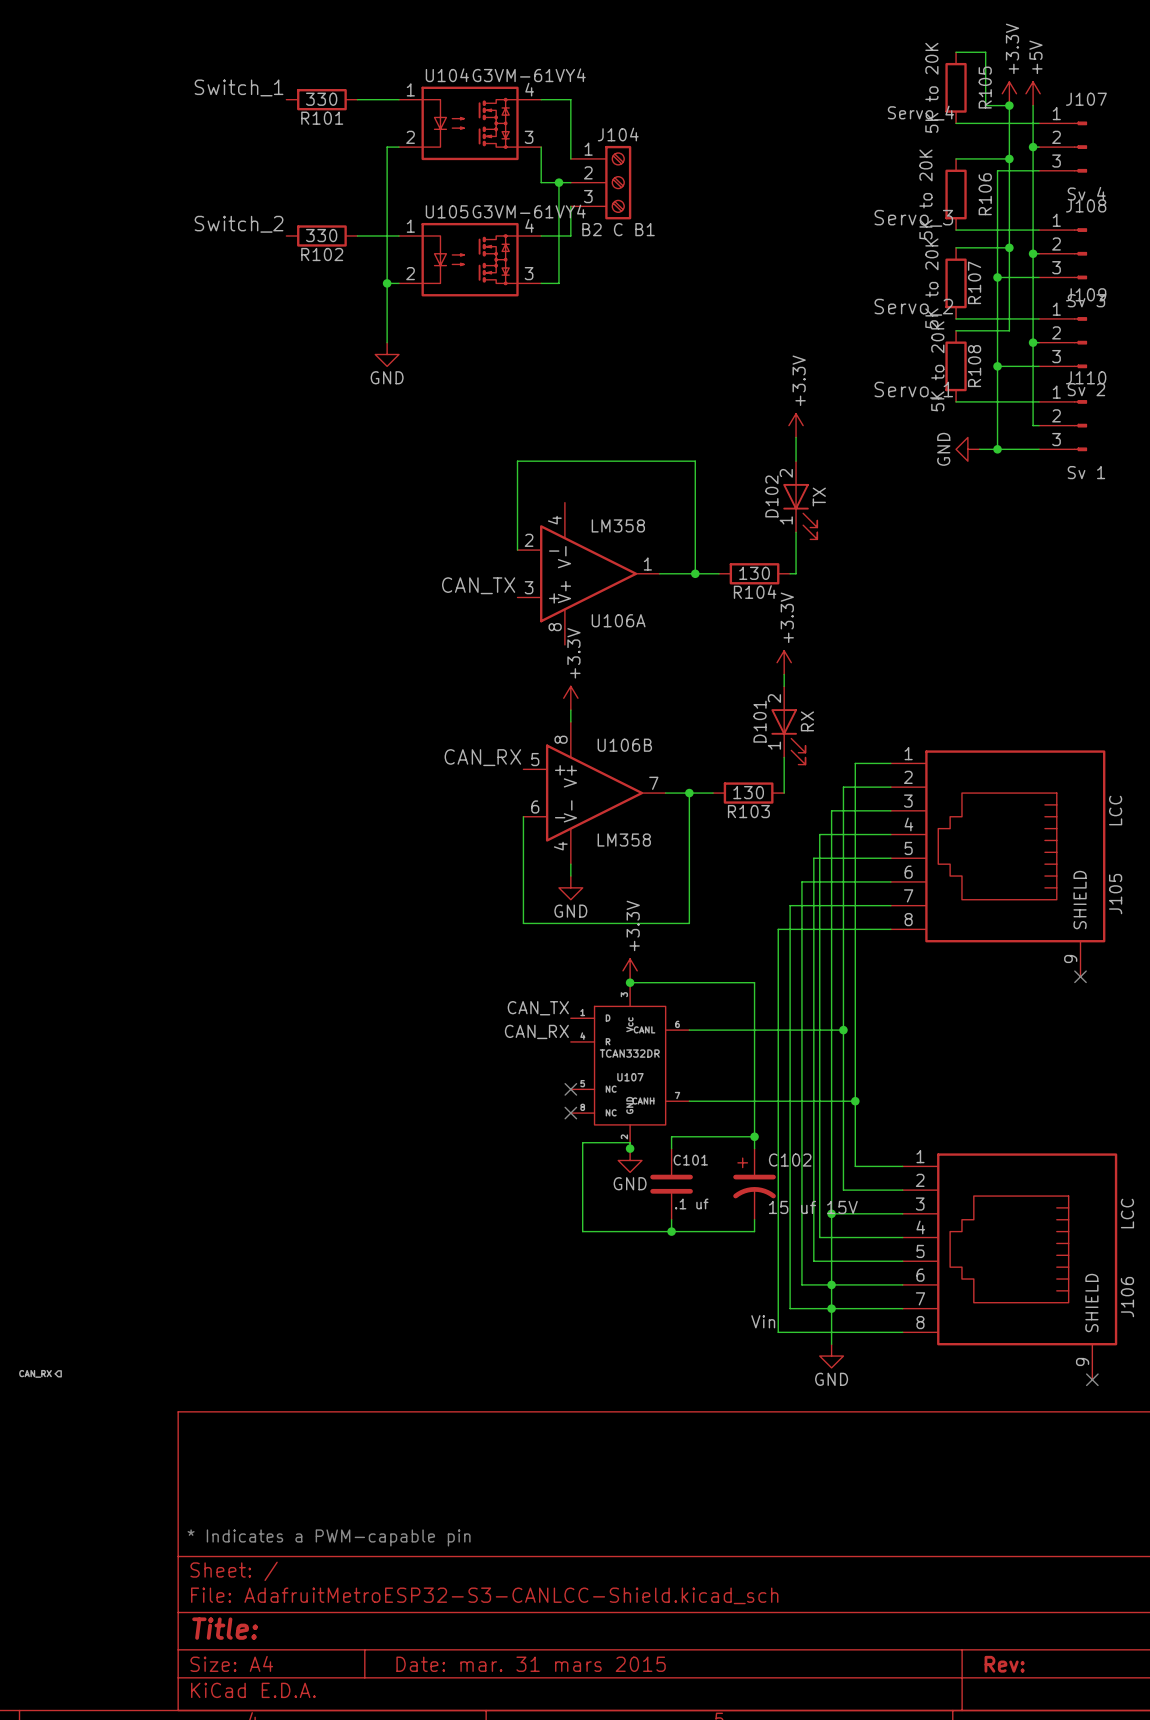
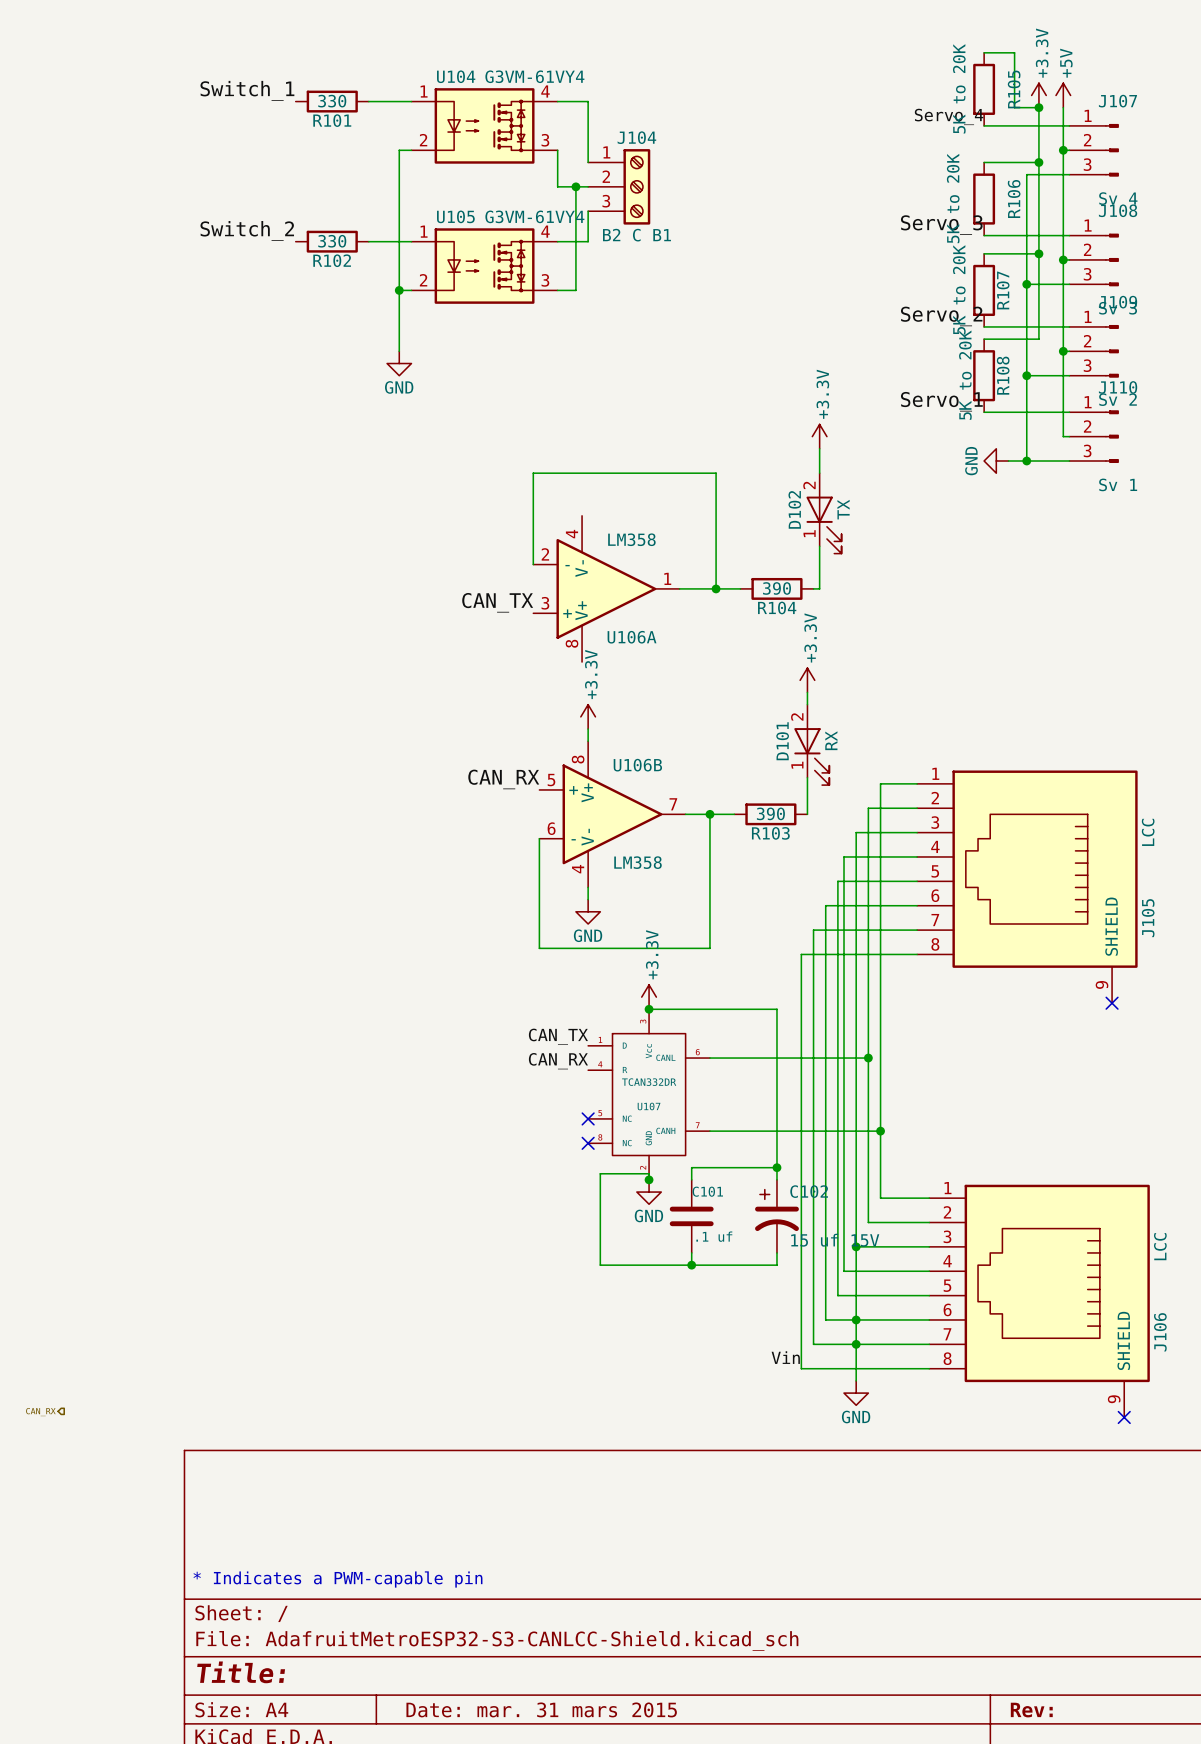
R104 value: 130 (754, 573) -> 390 (777, 588)
R103 value: 130 (748, 792) -> 390 (770, 813)

